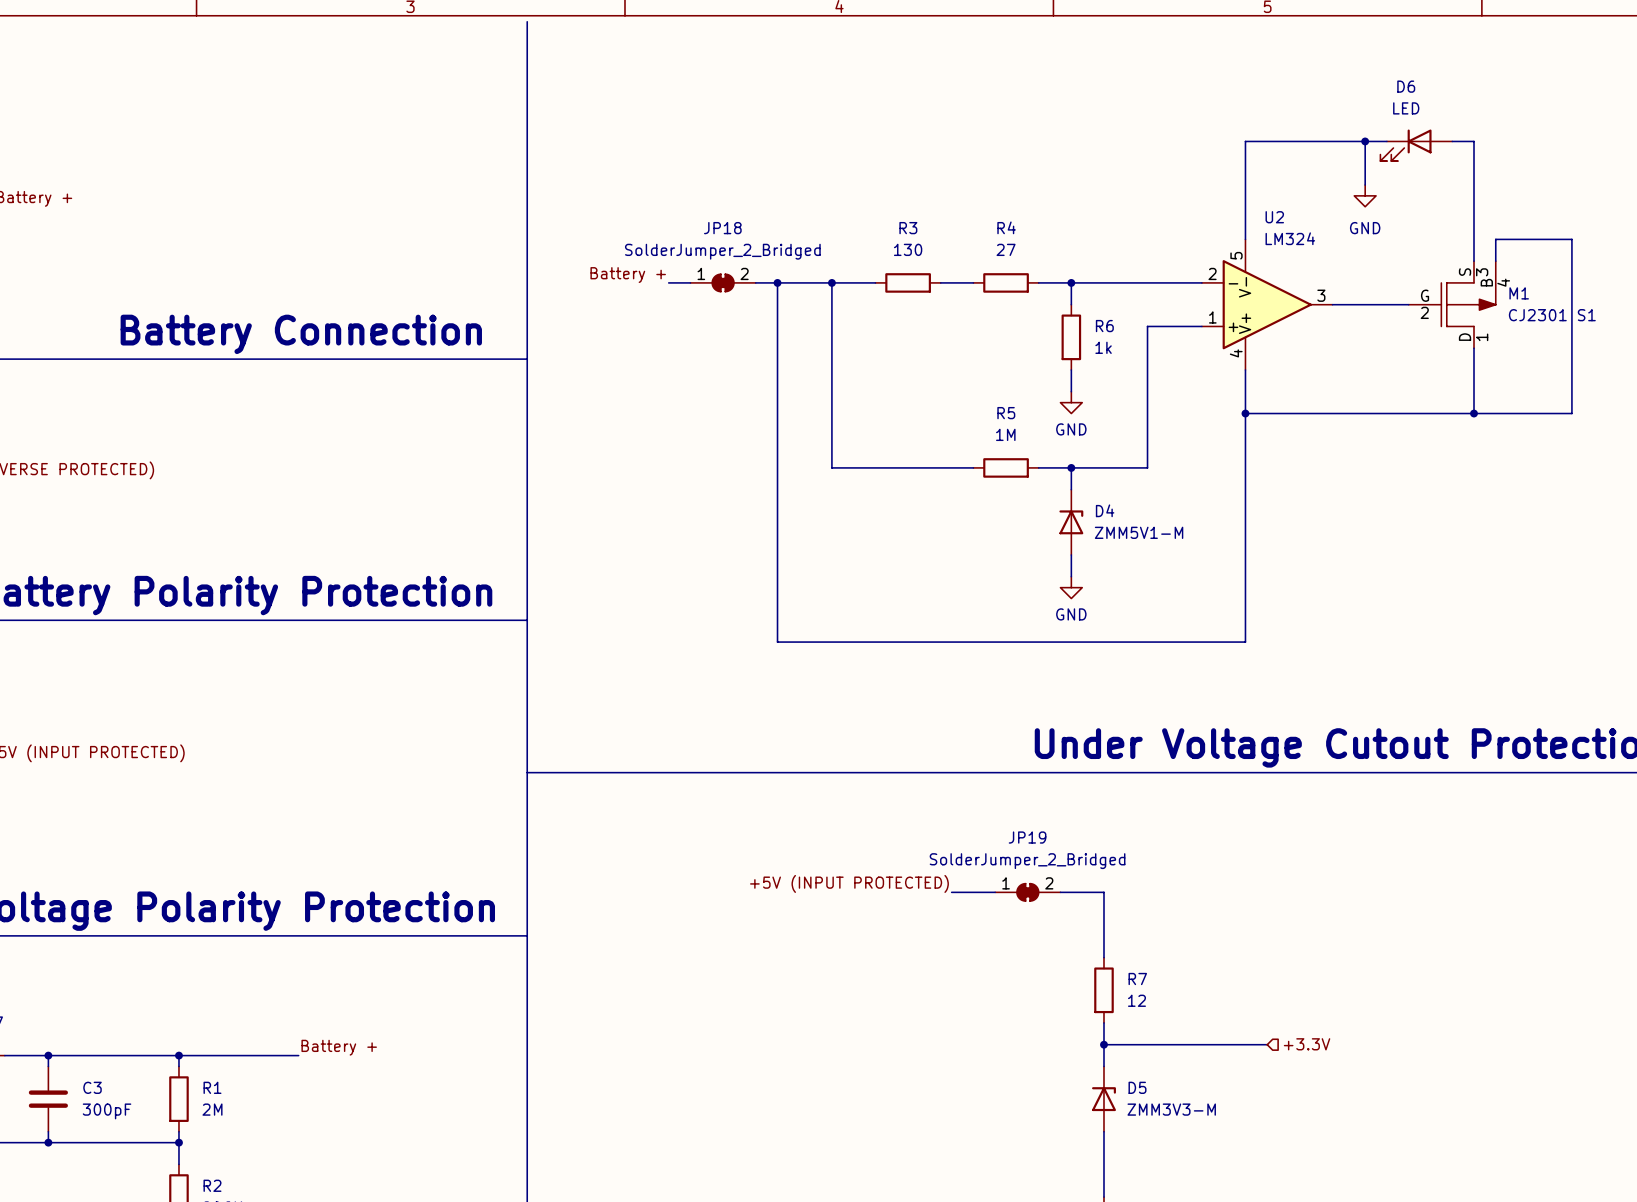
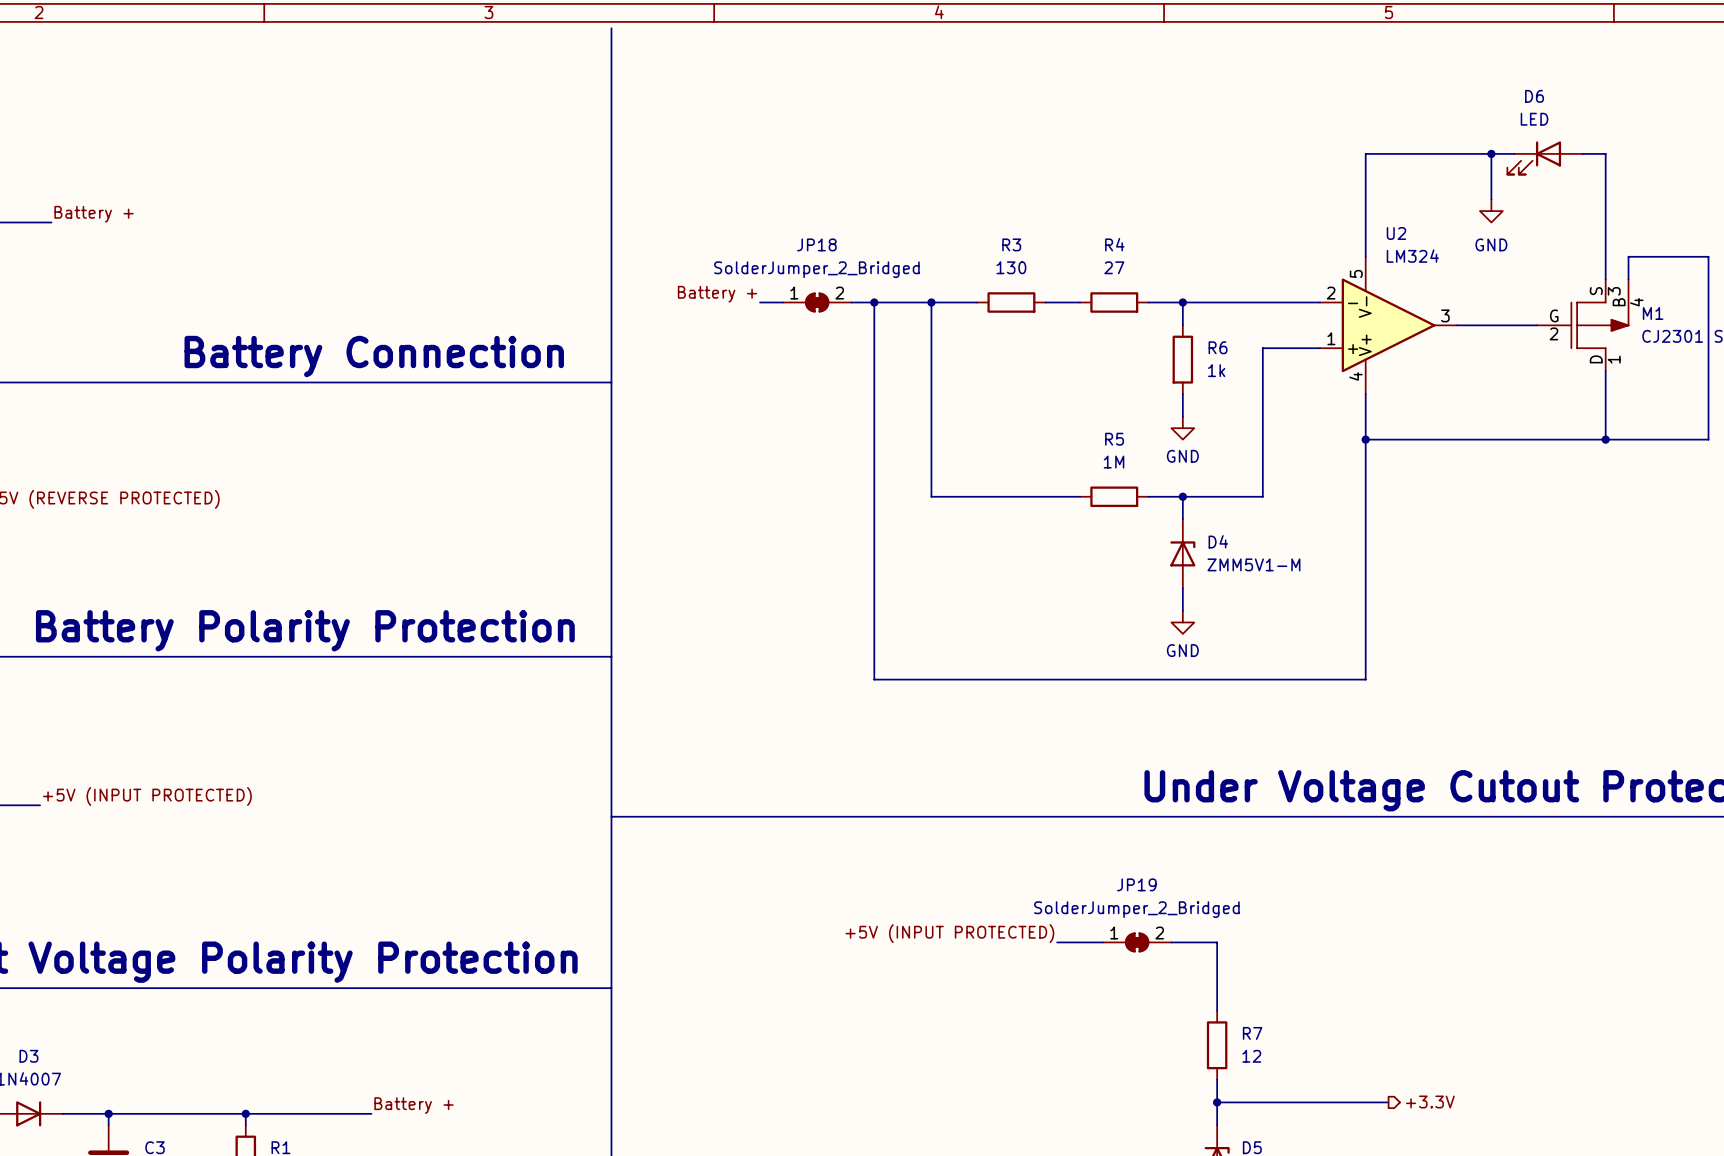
hierarchical label shape: input (1307, 1044) -> output (1430, 1101)

